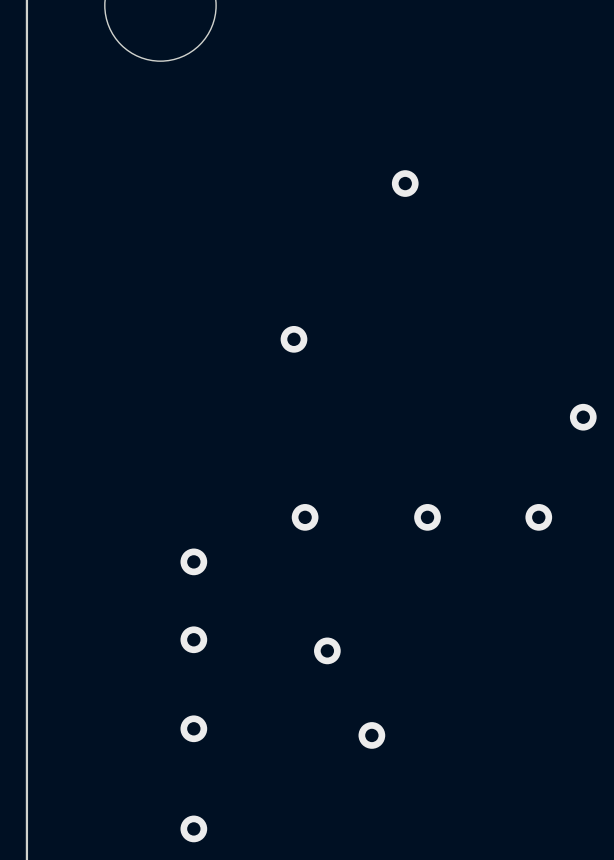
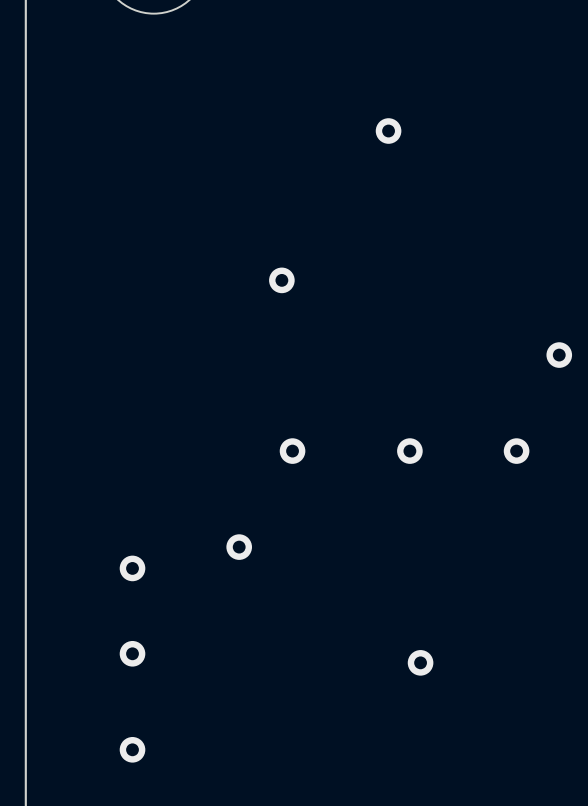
via: (193, 561) -> none
via: none -> (239, 547)
via: none -> (132, 568)
via: (193, 639) -> none
via: (327, 650) -> none
via: none -> (132, 653)
via: (193, 728) -> none
via position: (371, 735) -> (420, 662)
via: none -> (132, 749)
via: (193, 828) -> none

